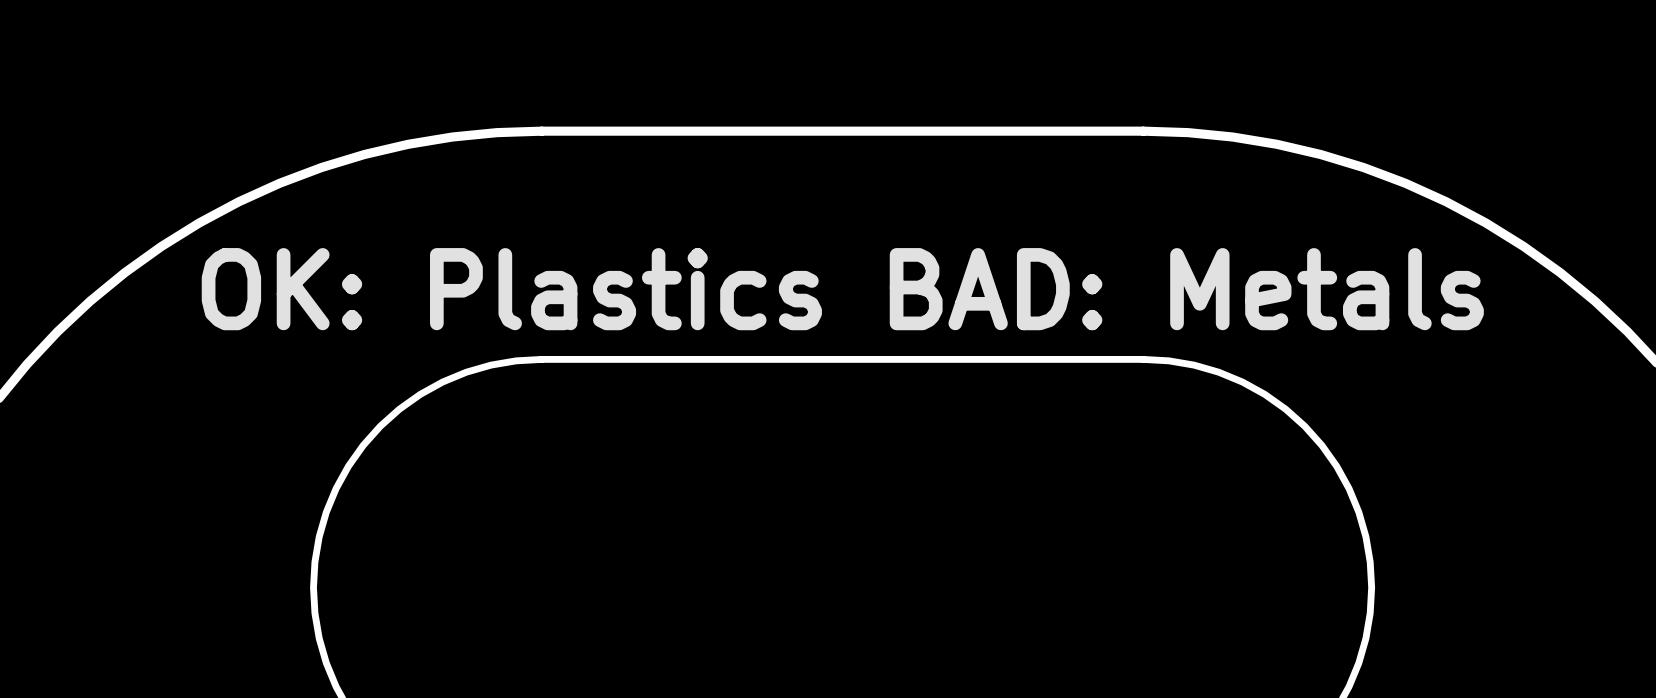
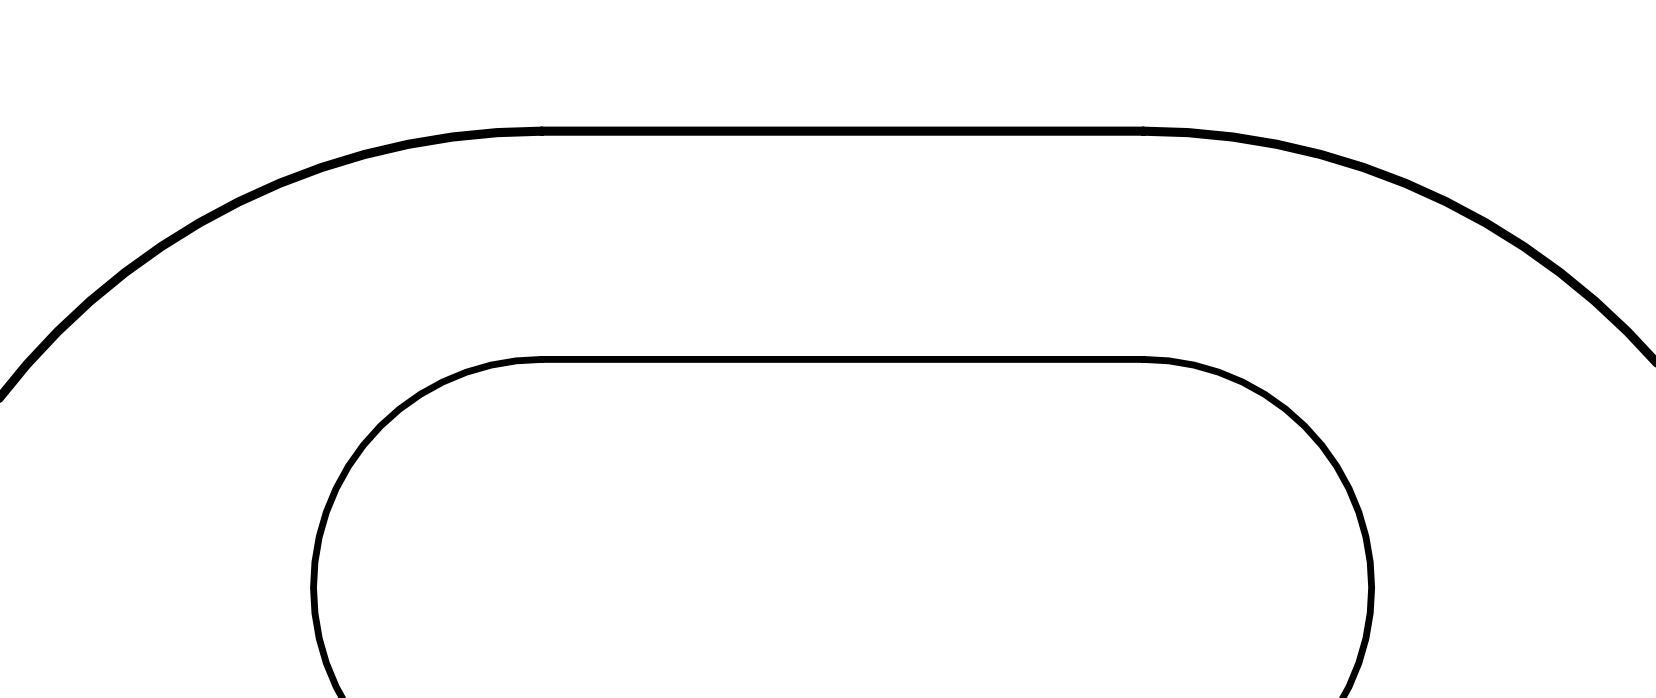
text: OK: Plastics BAD: Metals (842, 289) -> none

